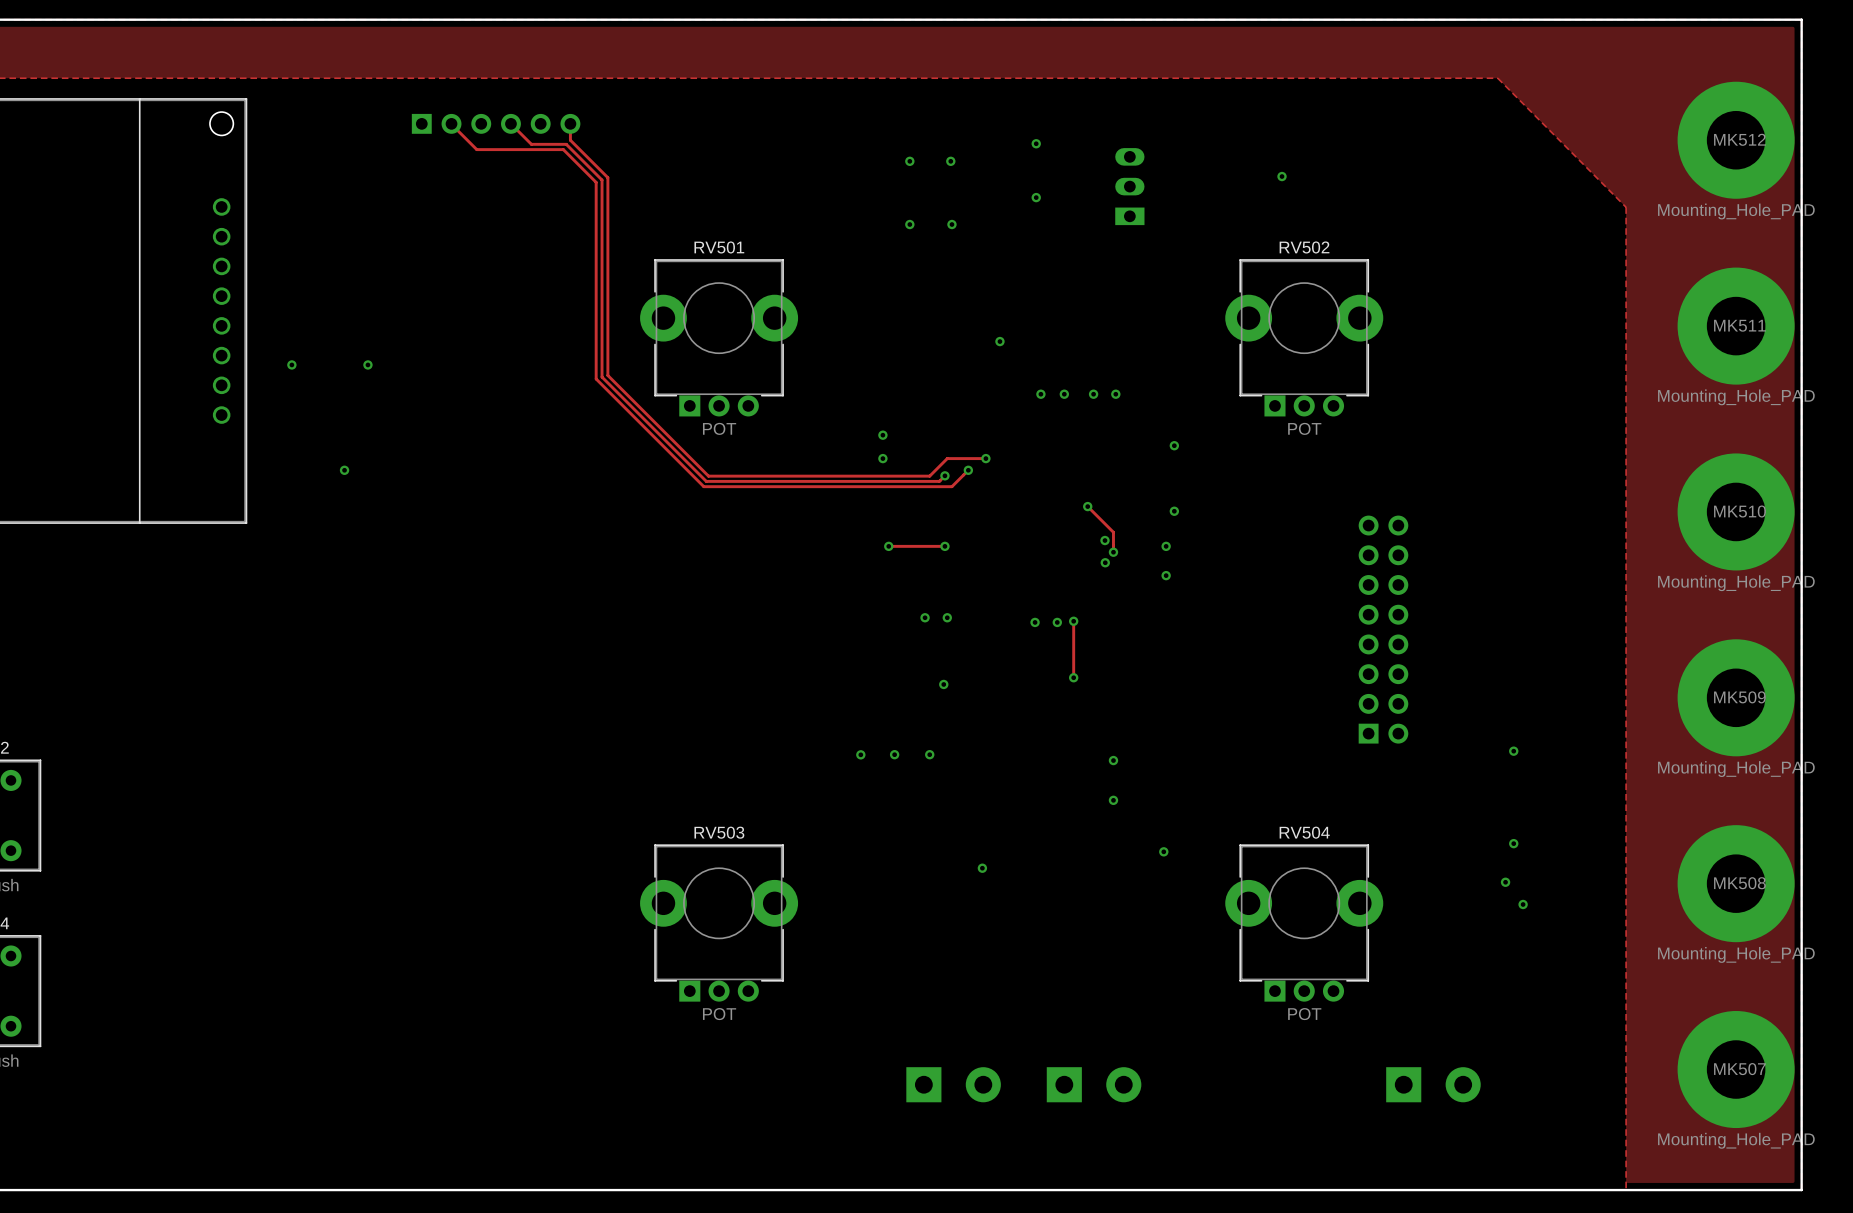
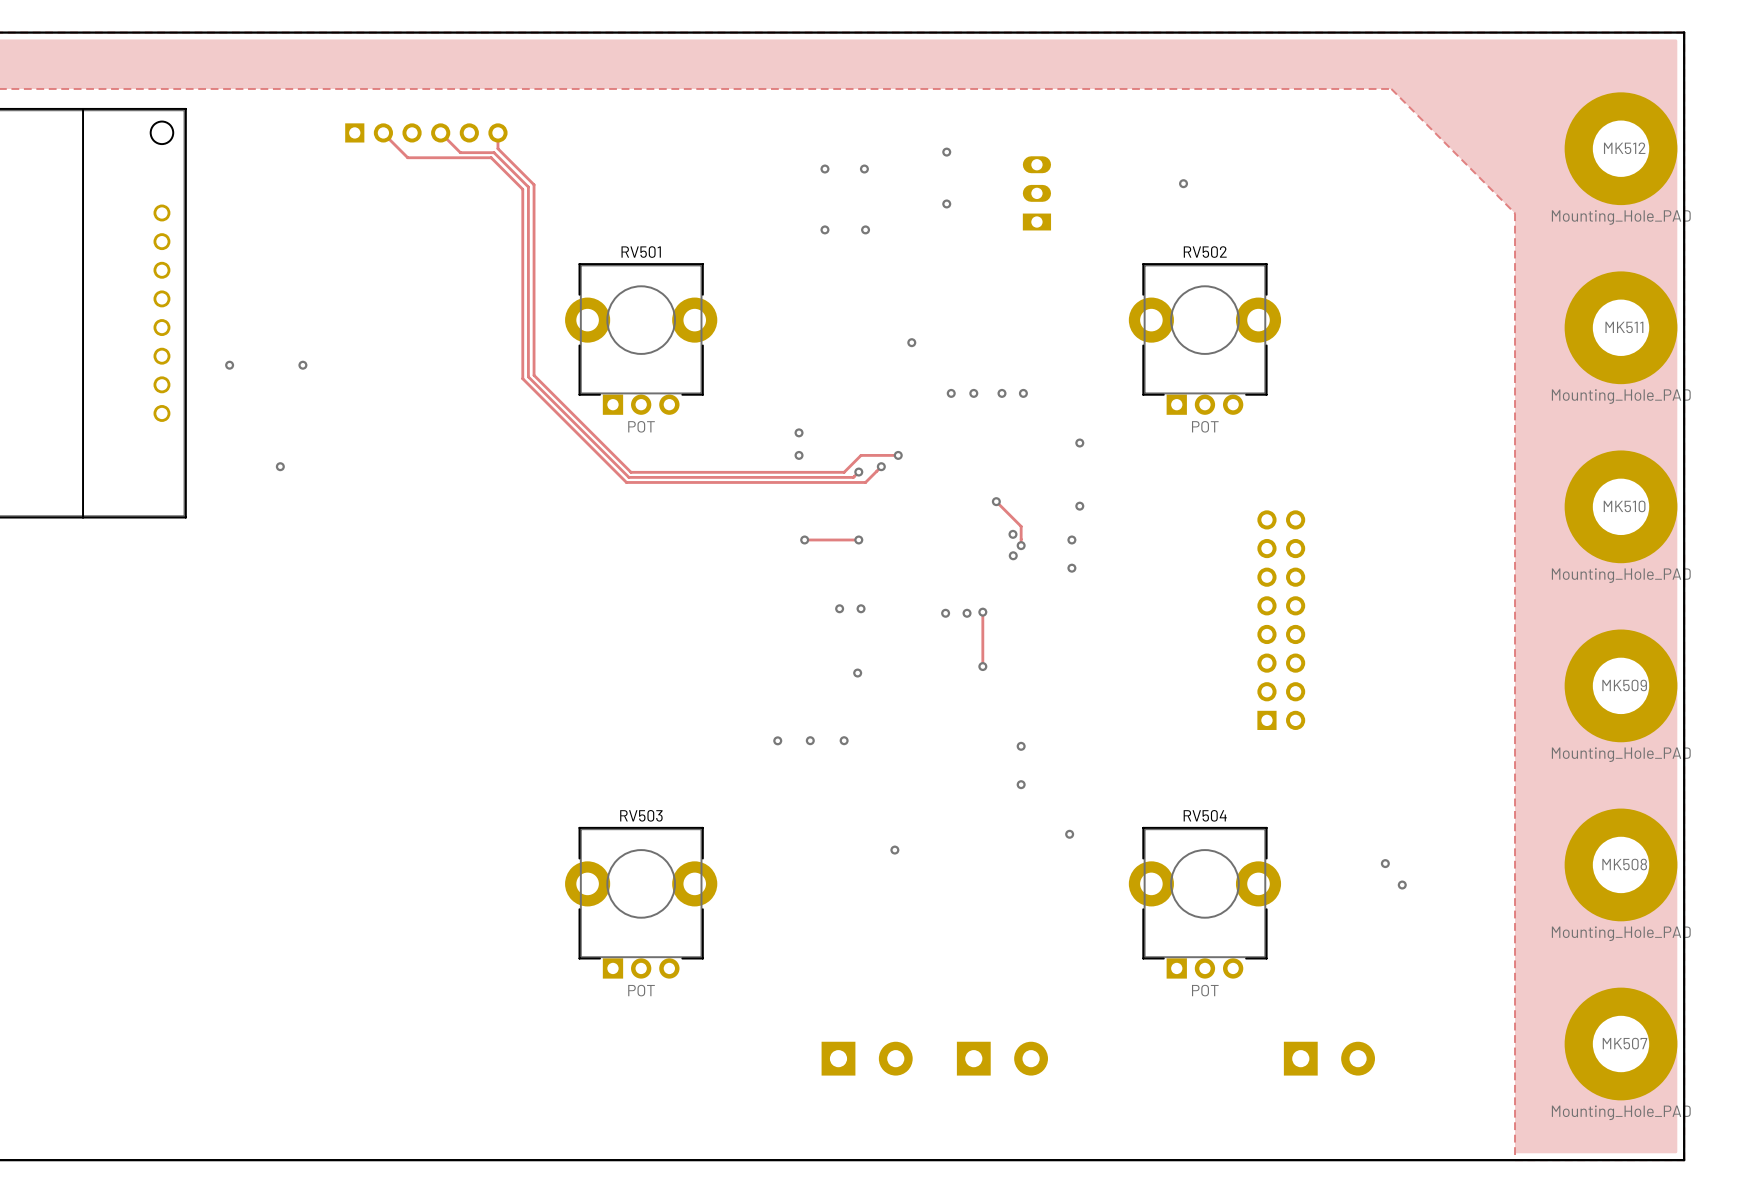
via: (1513, 751) -> none
via: (1513, 843) -> none
via: none -> (1385, 863)
via: (1505, 882) -> none
via: none -> (1402, 885)
via: (1523, 904) -> none

